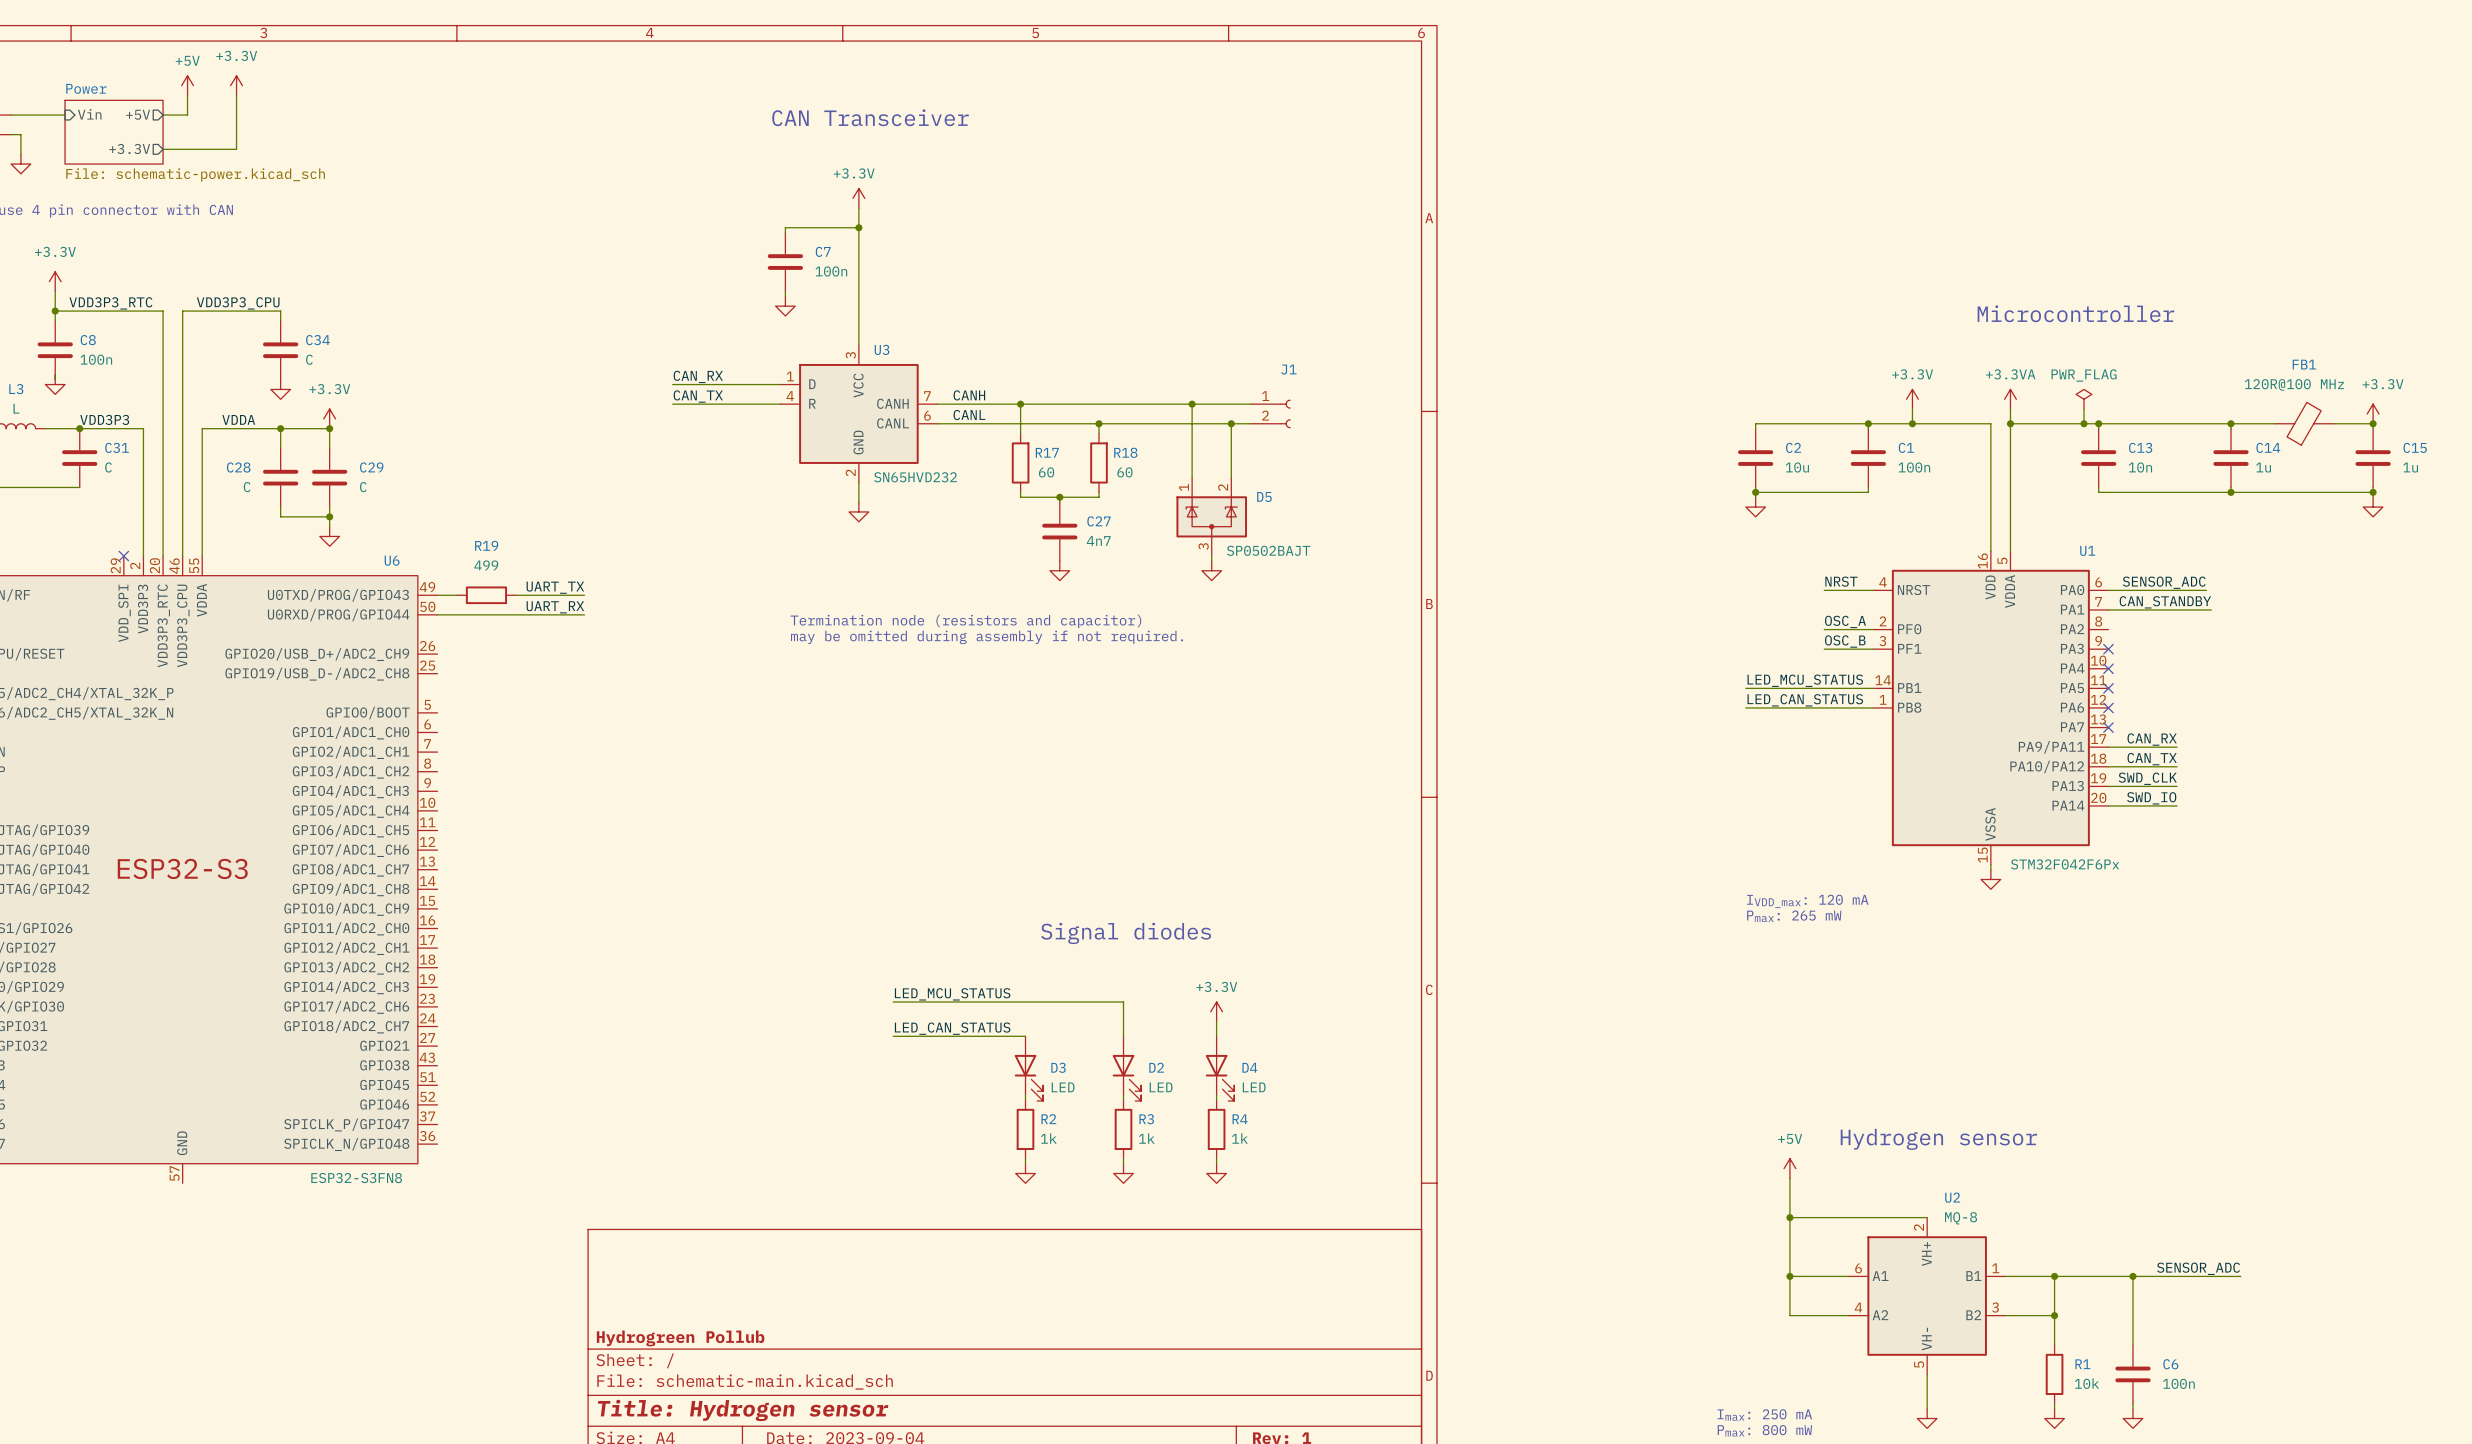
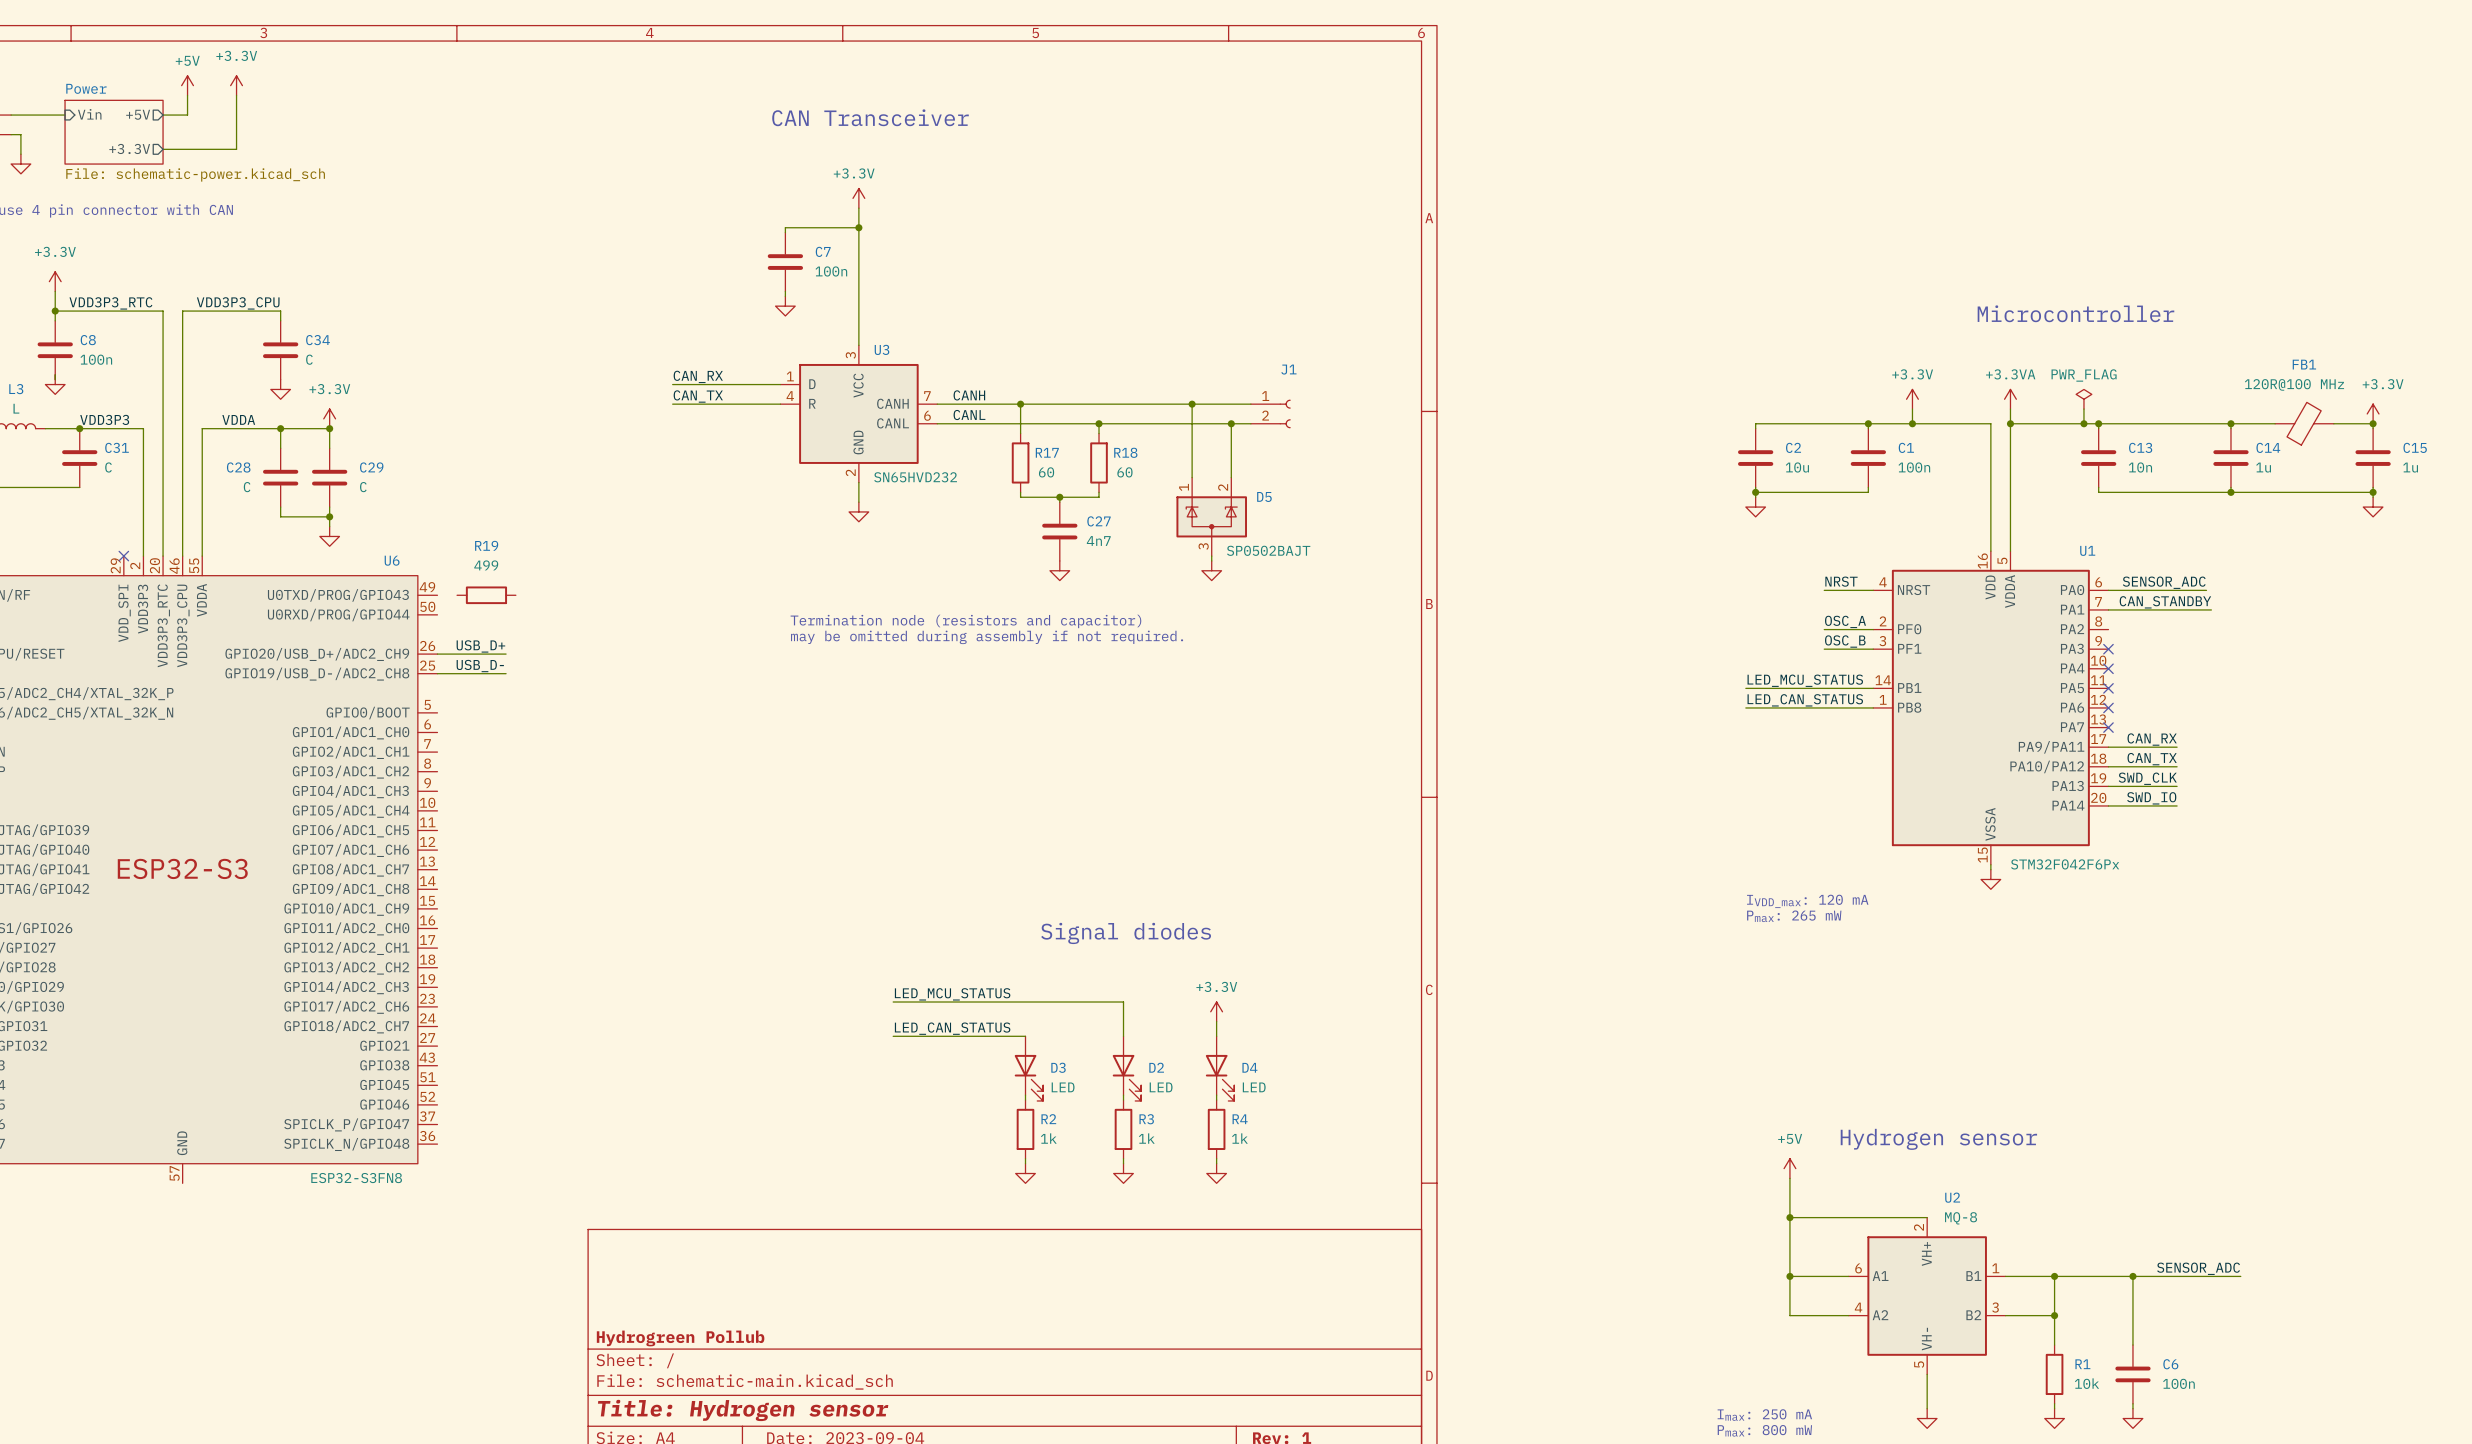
label: UART_TX (555, 587) -> none
wire: (437, 595) (457, 595) -> none
wire: (515, 595) (584, 595) -> (437, 654) (506, 654)
label: UART_RX (555, 607) -> none
wire: (437, 614) (584, 614) -> none
label: none -> USB_D+ (480, 646)
label: none -> USB_D- (480, 666)
wire: none -> (437, 673) (506, 673)

